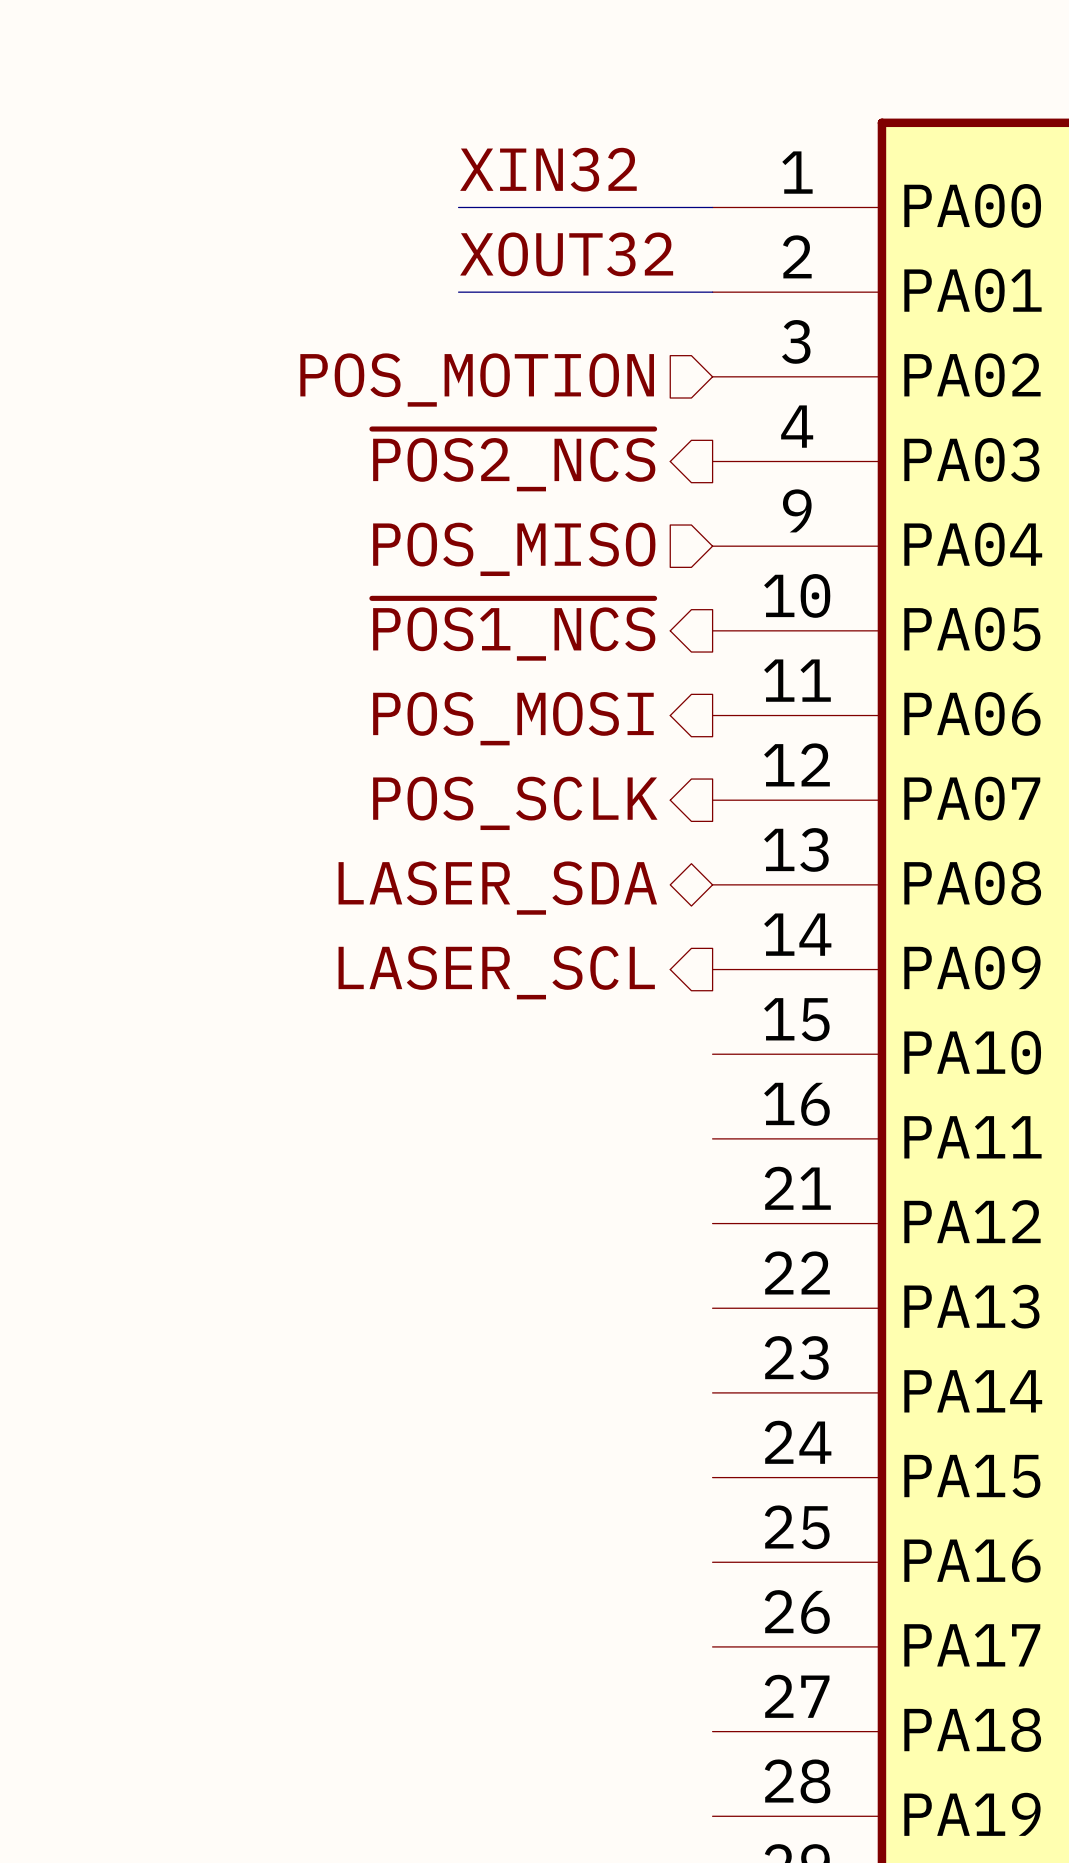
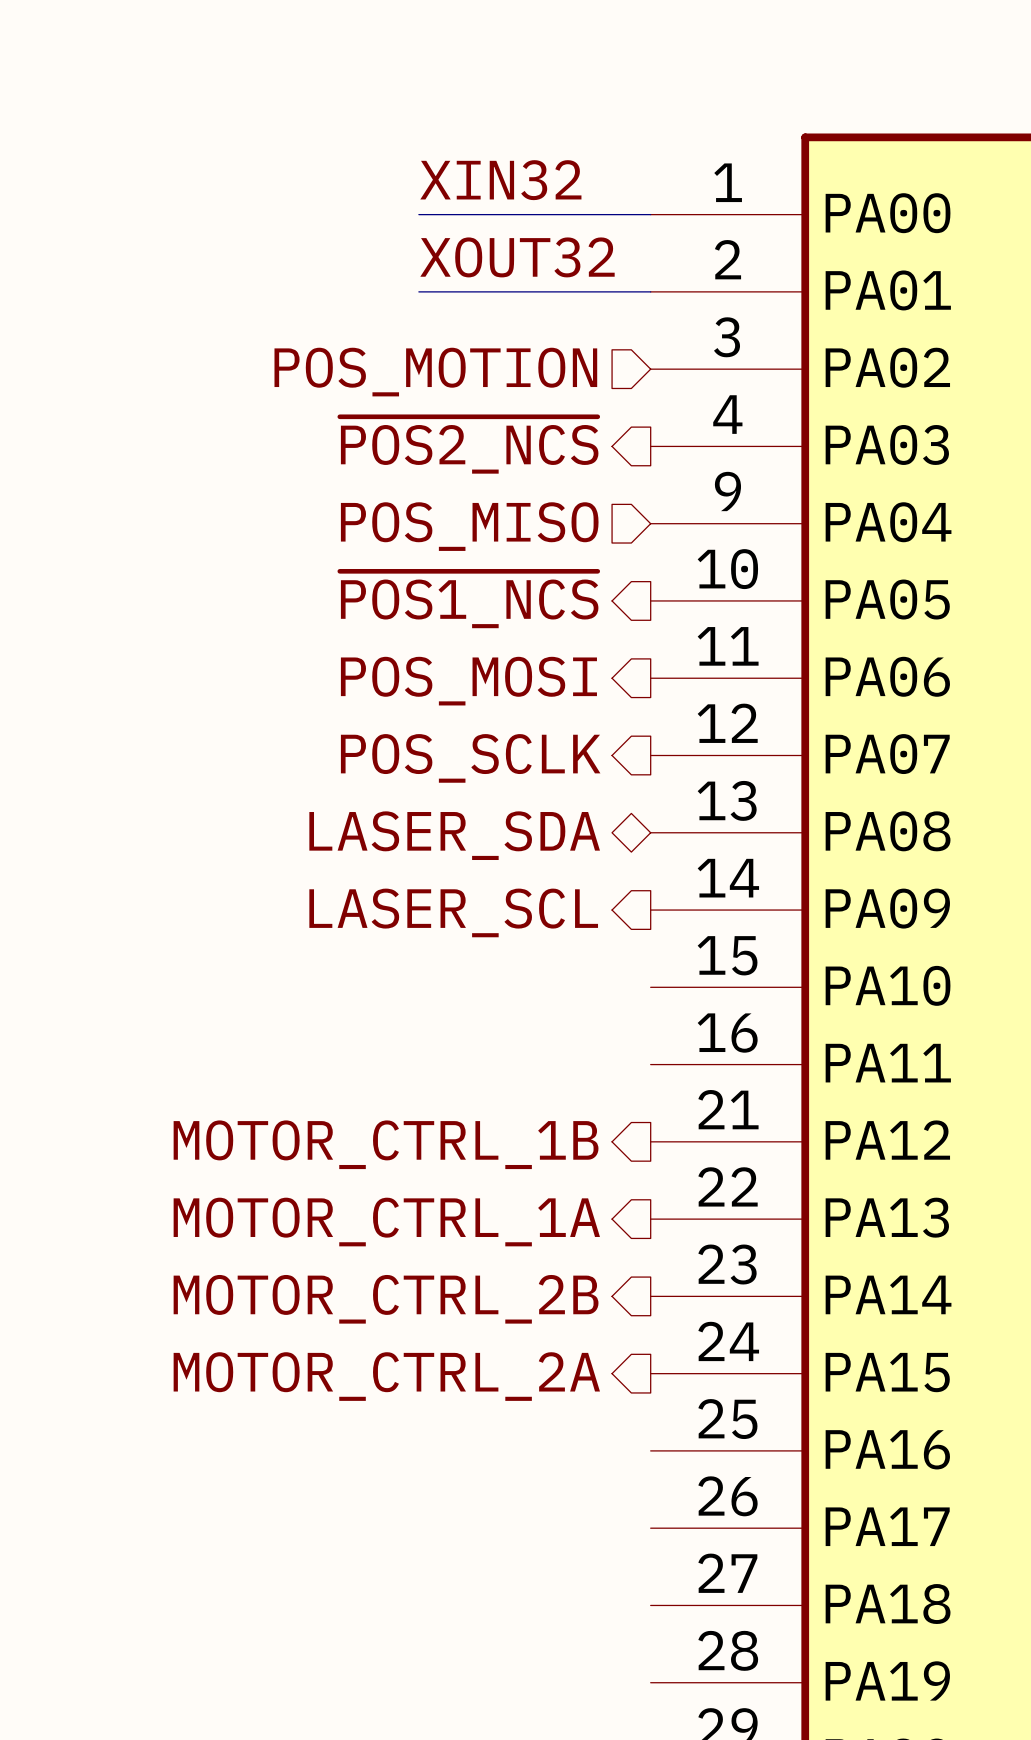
hierarchical label: none -> MOTOR_CTRL_1B (386, 1144)
hierarchical label: none -> MOTOR_CTRL_1A (386, 1222)
hierarchical label: none -> MOTOR_CTRL_2B (386, 1299)
hierarchical label: none -> MOTOR_CTRL_2A (386, 1376)

